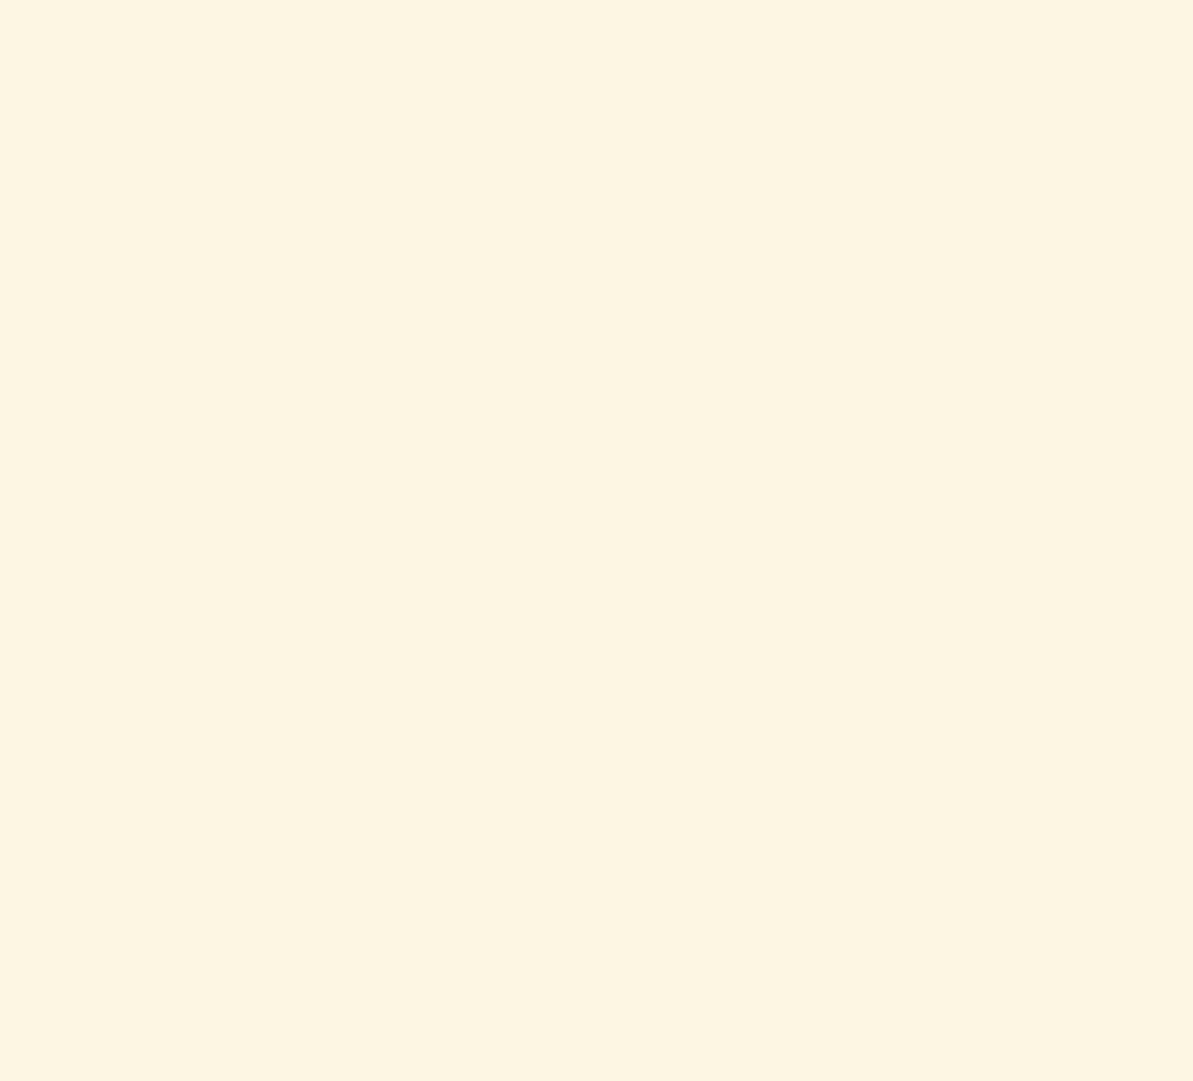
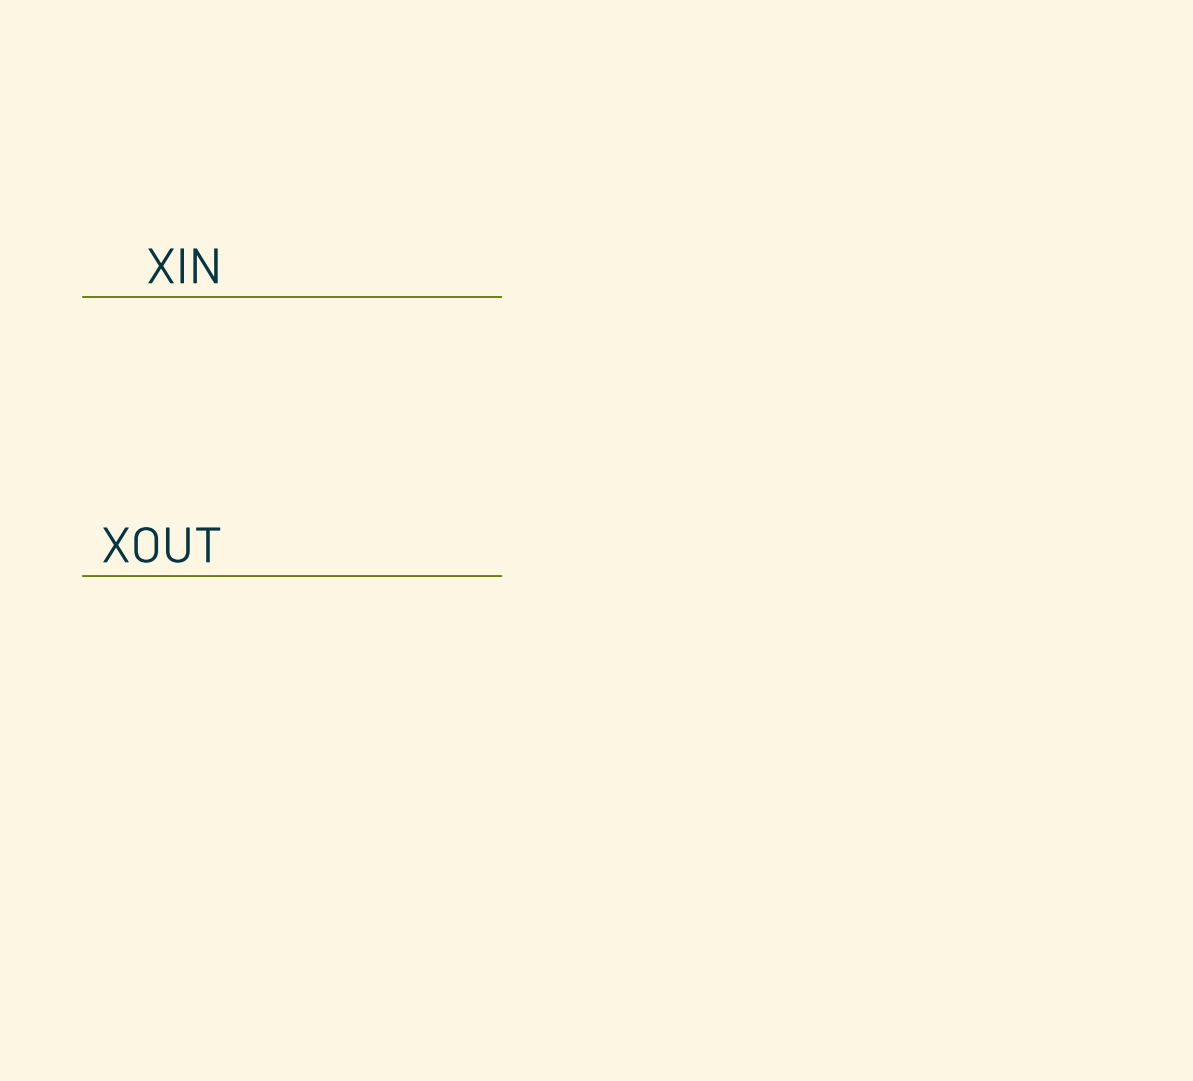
label: none -> XIN (182, 265)
wire: none -> (82, 296) (501, 296)
label: none -> XOUT (161, 544)
wire: none -> (82, 576) (501, 576)

